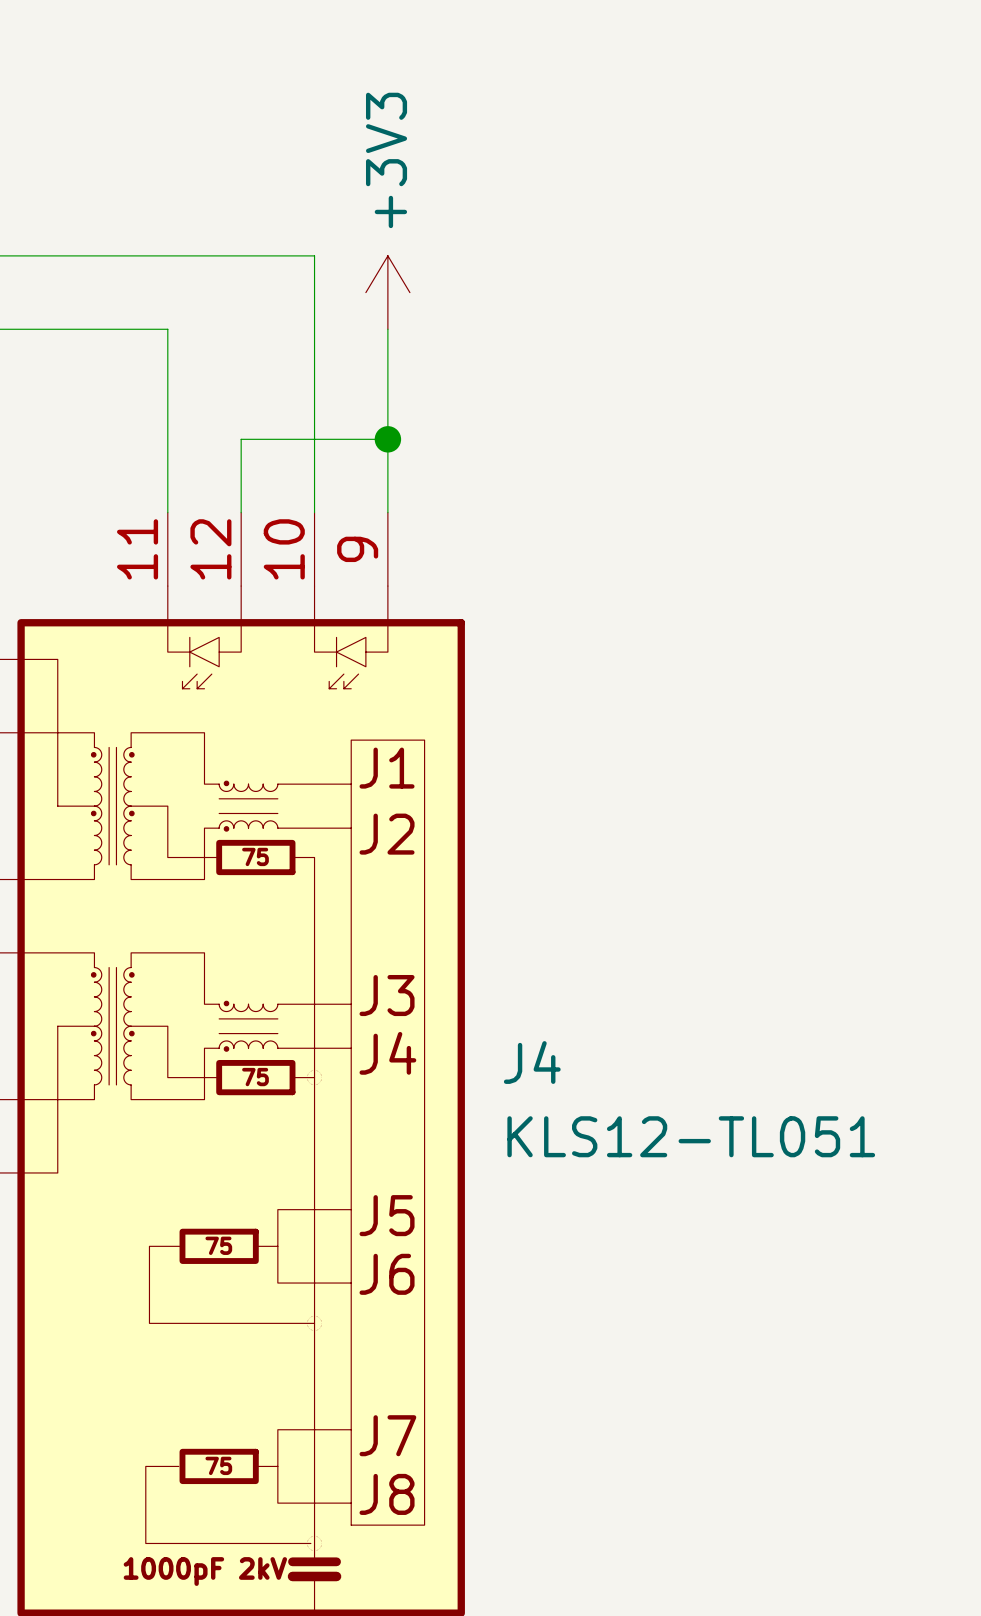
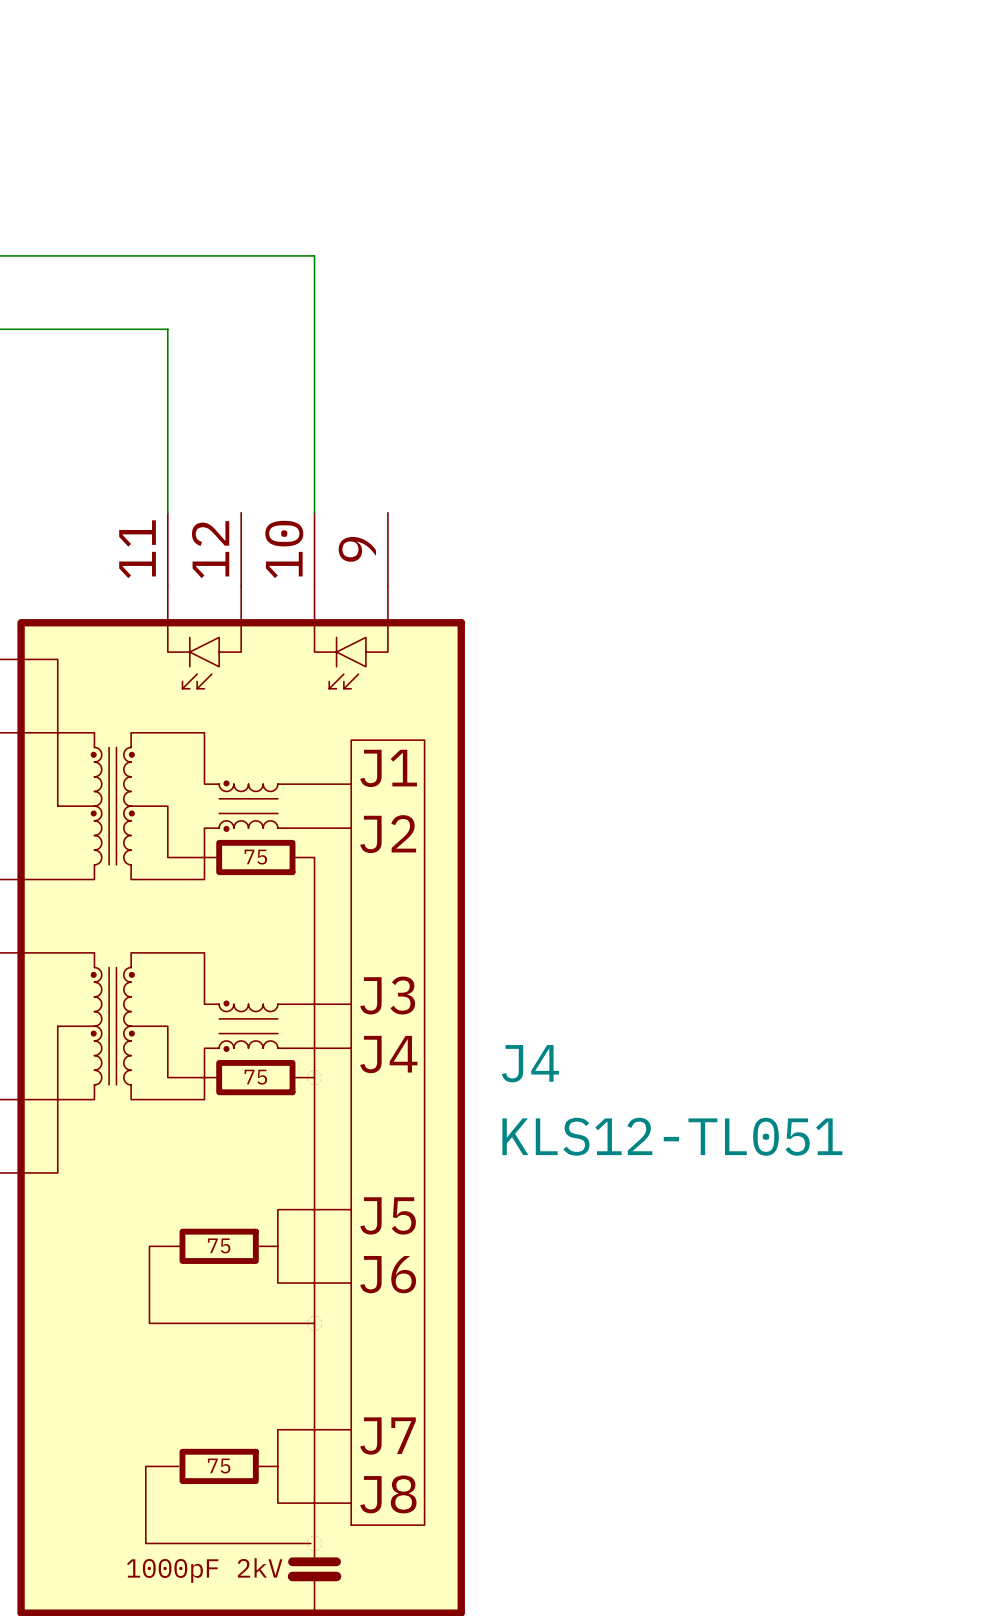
power symbol: +3V3 (387, 292) -> none
wire: (387, 329) (387, 512) -> none
wire: (387, 439) (241, 439) (241, 512) -> none
junction: (387, 439) -> none

